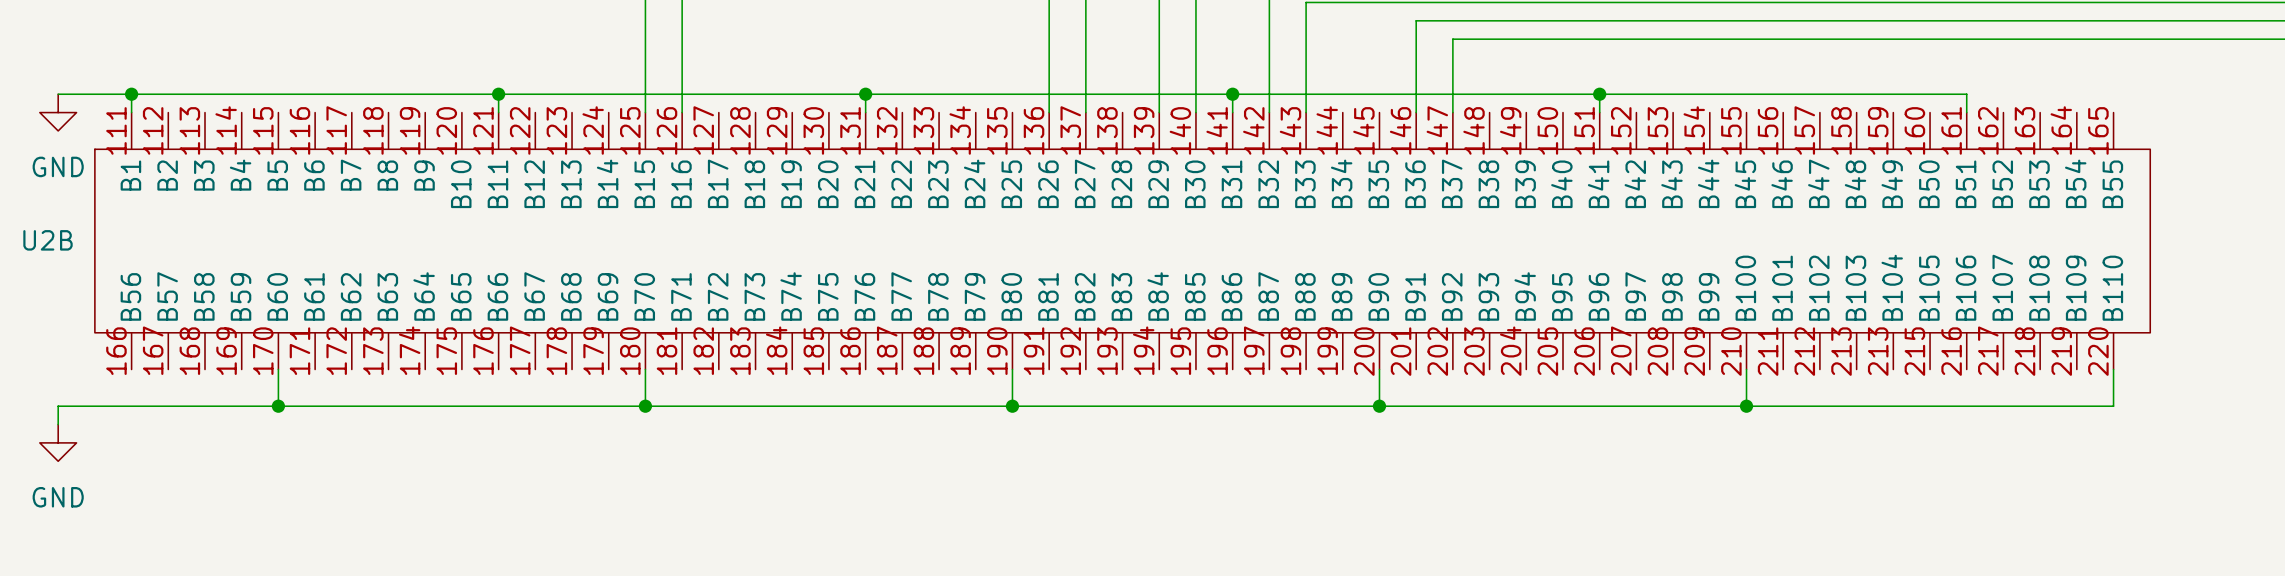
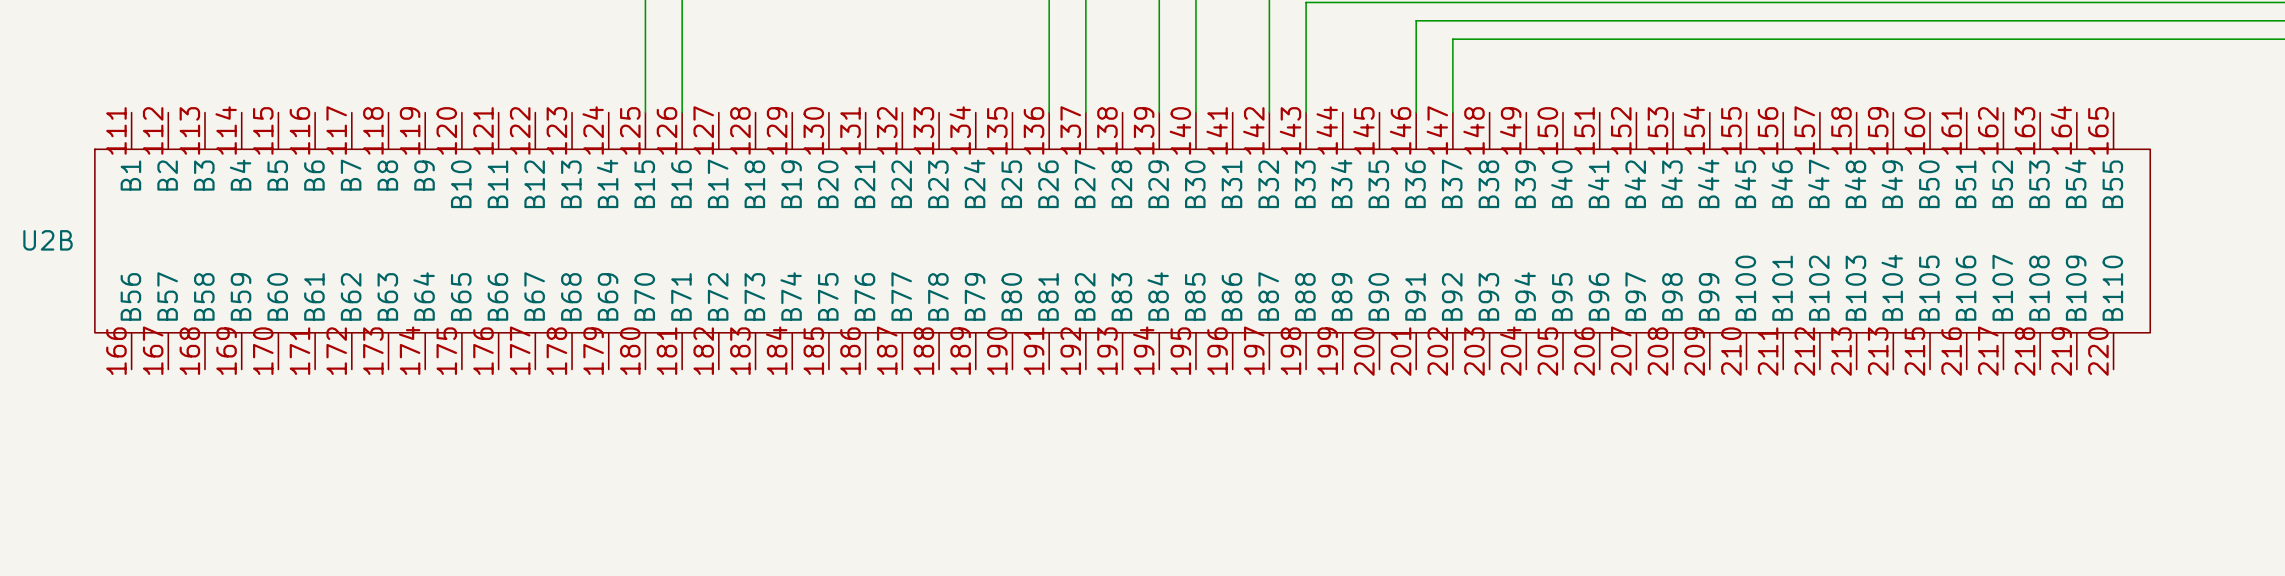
wire: (58, 94) (1966, 94) (1966, 112) -> none
wire: (131, 94) (131, 112) -> none
junction: (131, 94) -> none
wire: (498, 94) (498, 112) -> none
junction: (498, 94) -> none
wire: (865, 94) (865, 112) -> none
junction: (865, 94) -> none
wire: (1232, 94) (1232, 112) -> none
junction: (1232, 94) -> none
wire: (1599, 94) (1599, 112) -> none
junction: (1599, 94) -> none
power symbol: GND (58, 112) -> none
wire: (278, 369) (278, 406) -> none
wire: (645, 369) (645, 406) -> none
wire: (1012, 369) (1012, 406) -> none
wire: (1379, 369) (1379, 406) -> none
wire: (1746, 369) (1746, 406) -> none
wire: (2113, 369) (2113, 406) (58, 406) (58, 424) -> none
junction: (278, 406) -> none
junction: (645, 406) -> none
junction: (1012, 406) -> none
junction: (1379, 406) -> none
junction: (1746, 406) -> none
power symbol: GND (58, 442) -> none

